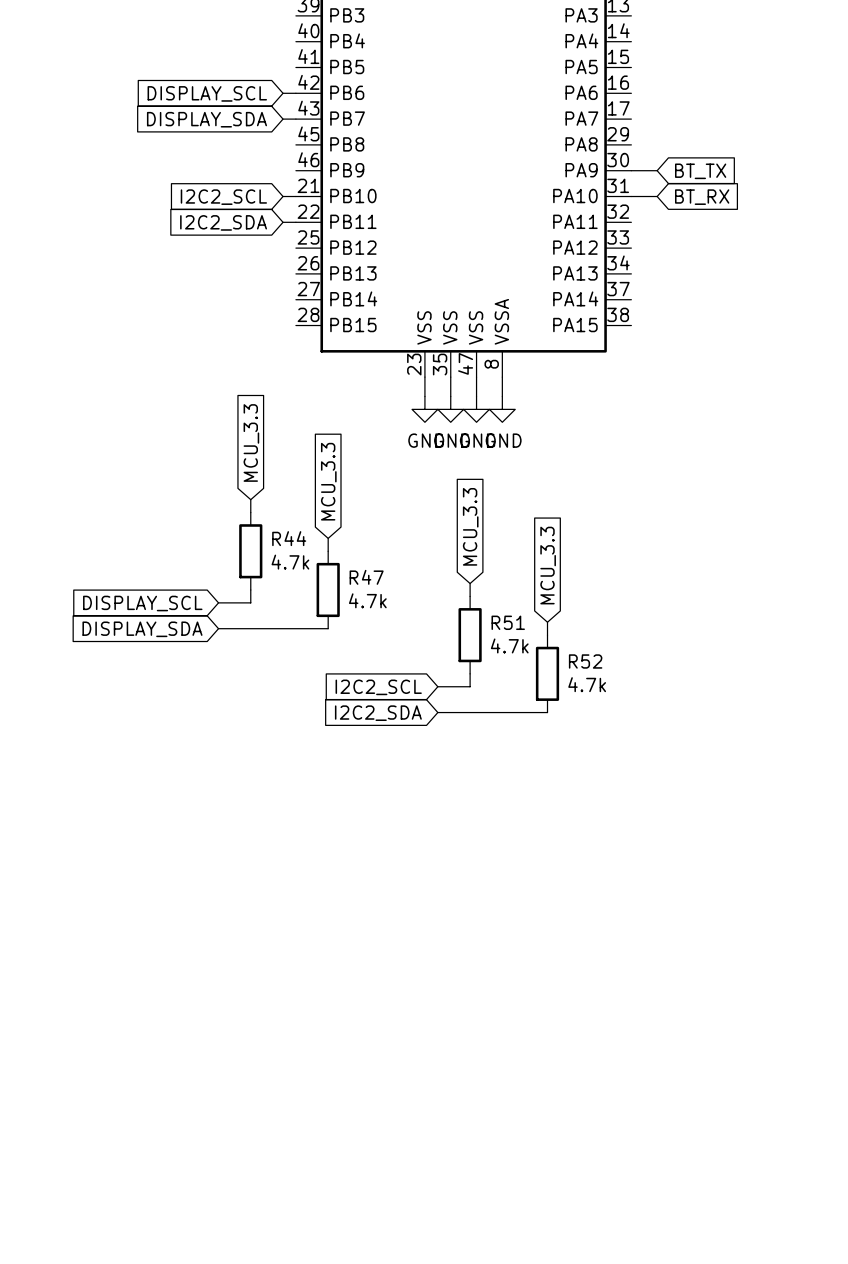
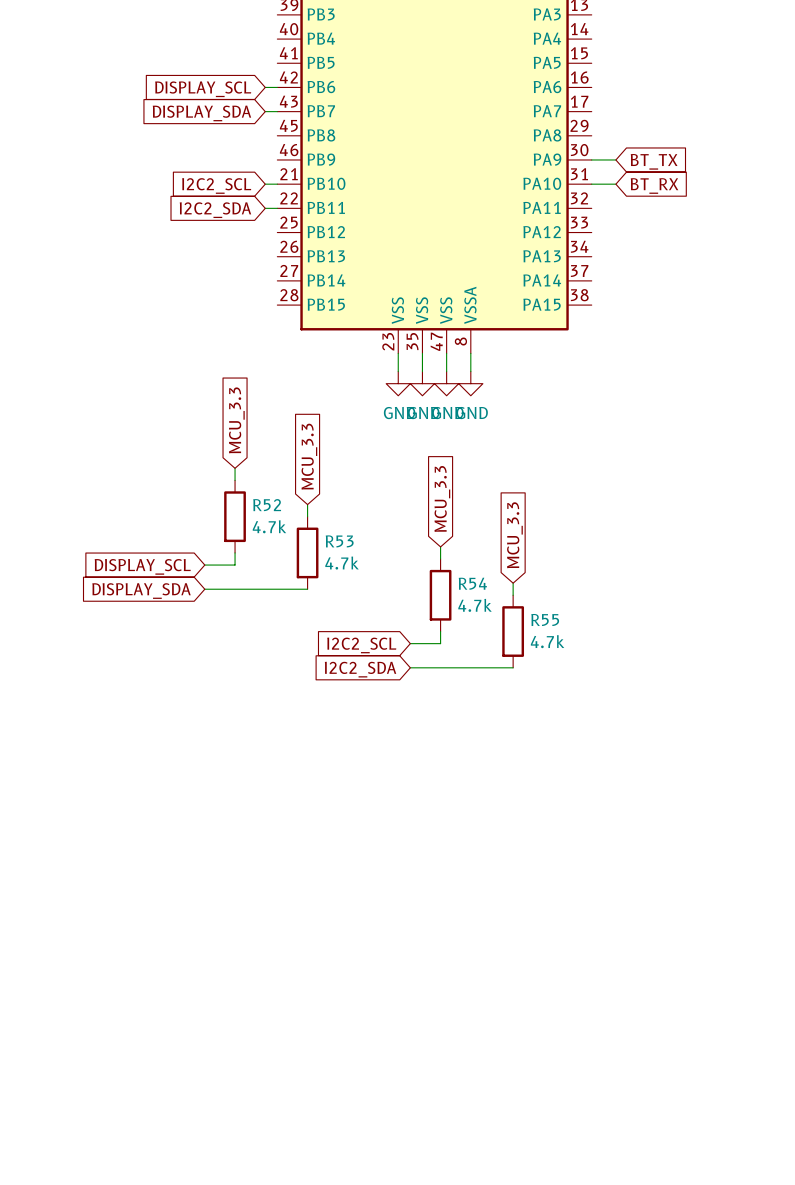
R44 name: R44 (289, 538) -> R52 (267, 505)
R47 name: R47 (366, 577) -> R53 (339, 541)
R51 name: R51 (508, 622) -> R54 (472, 583)
R52 name: R52 (585, 661) -> R55 (545, 620)

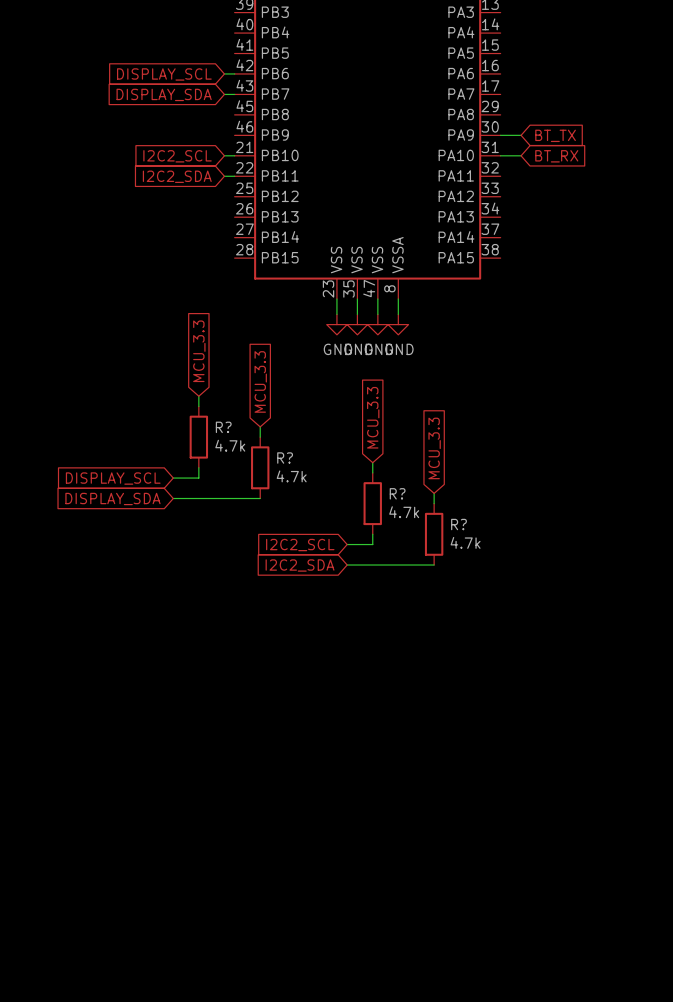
R52 name: R52 (267, 505) -> R? (223, 427)
R53 name: R53 (339, 541) -> R? (285, 458)
R54 name: R54 (472, 583) -> R? (397, 493)
R55 name: R55 (545, 620) -> R? (459, 524)

